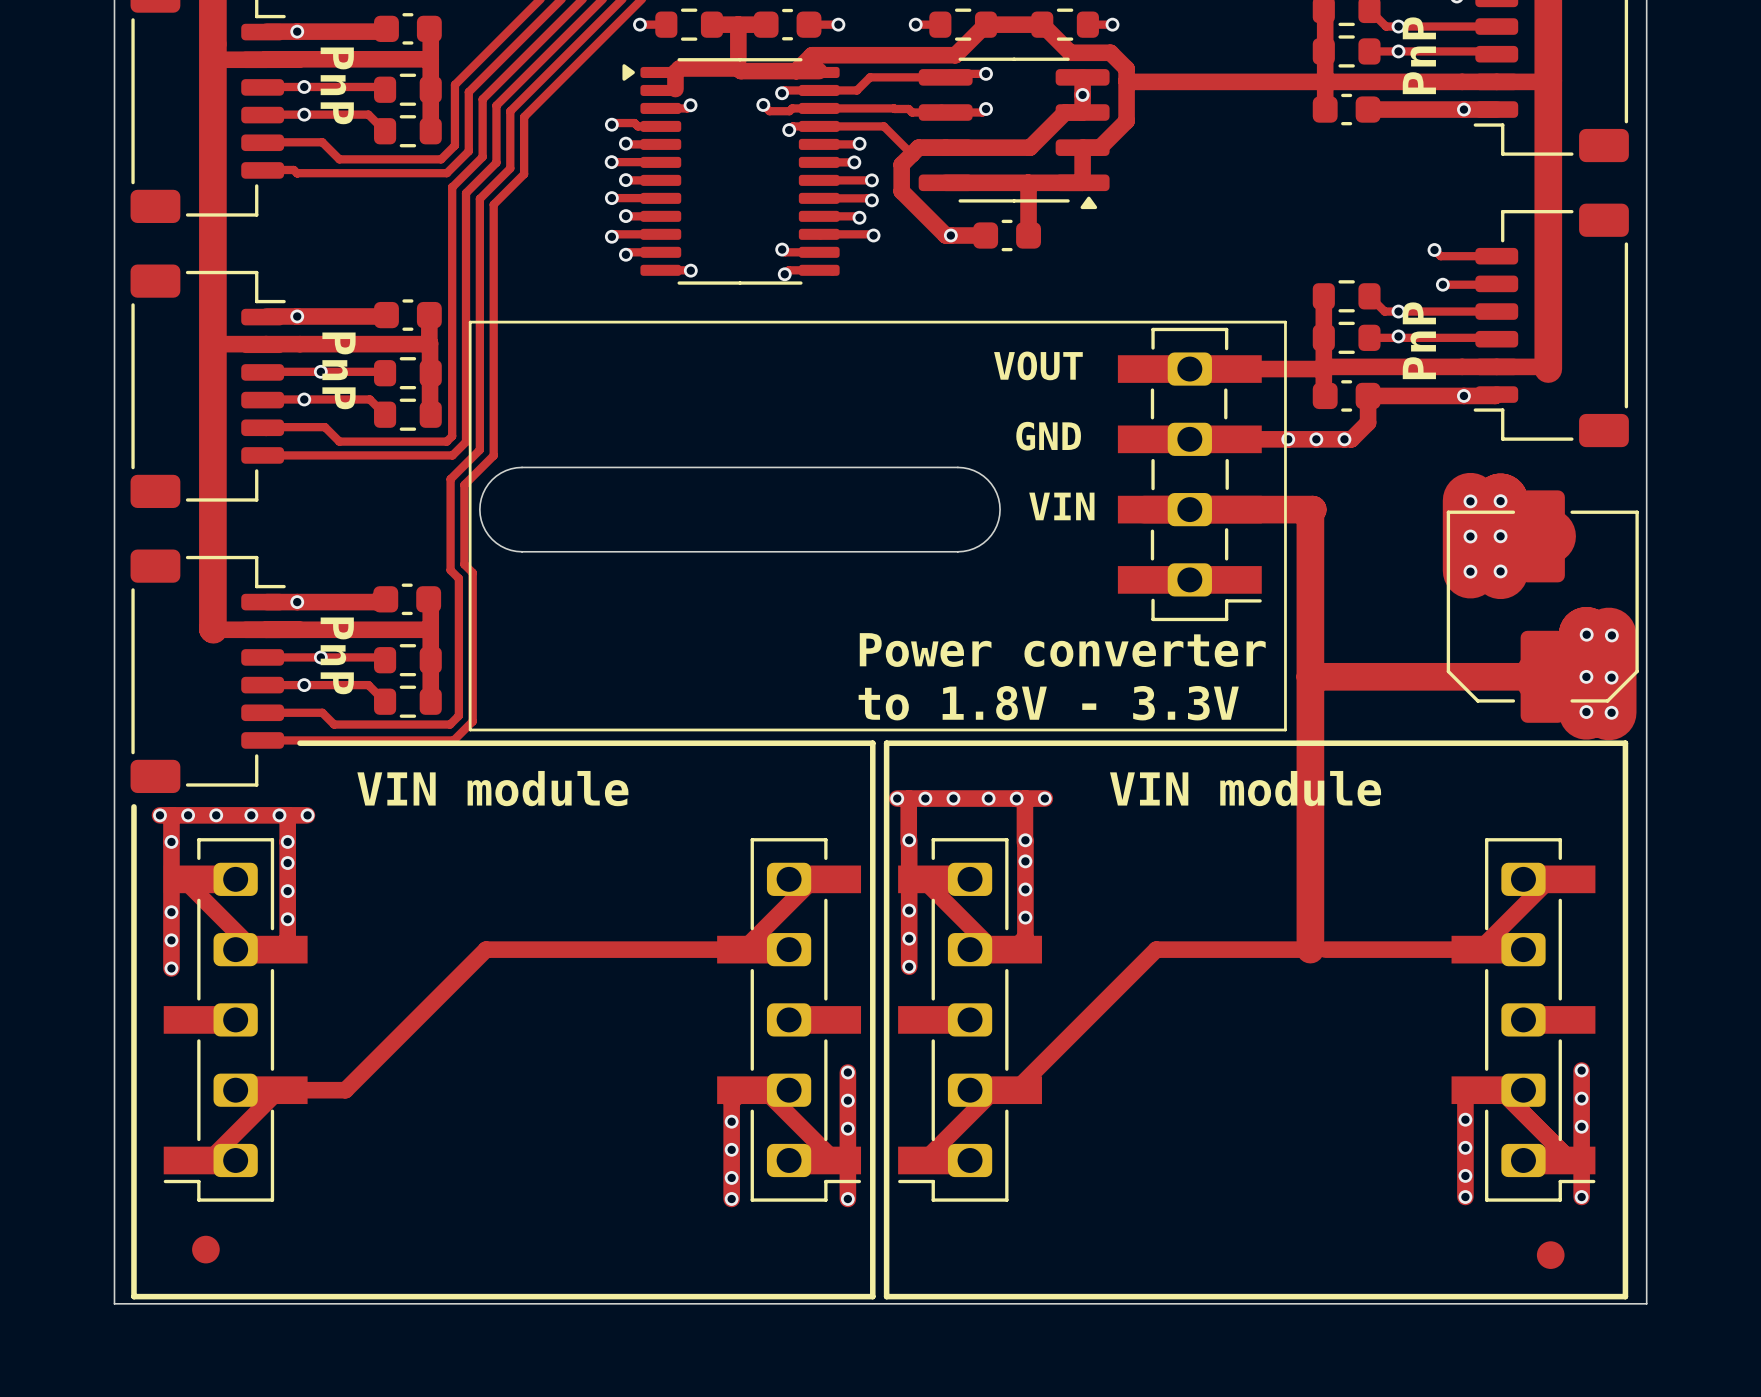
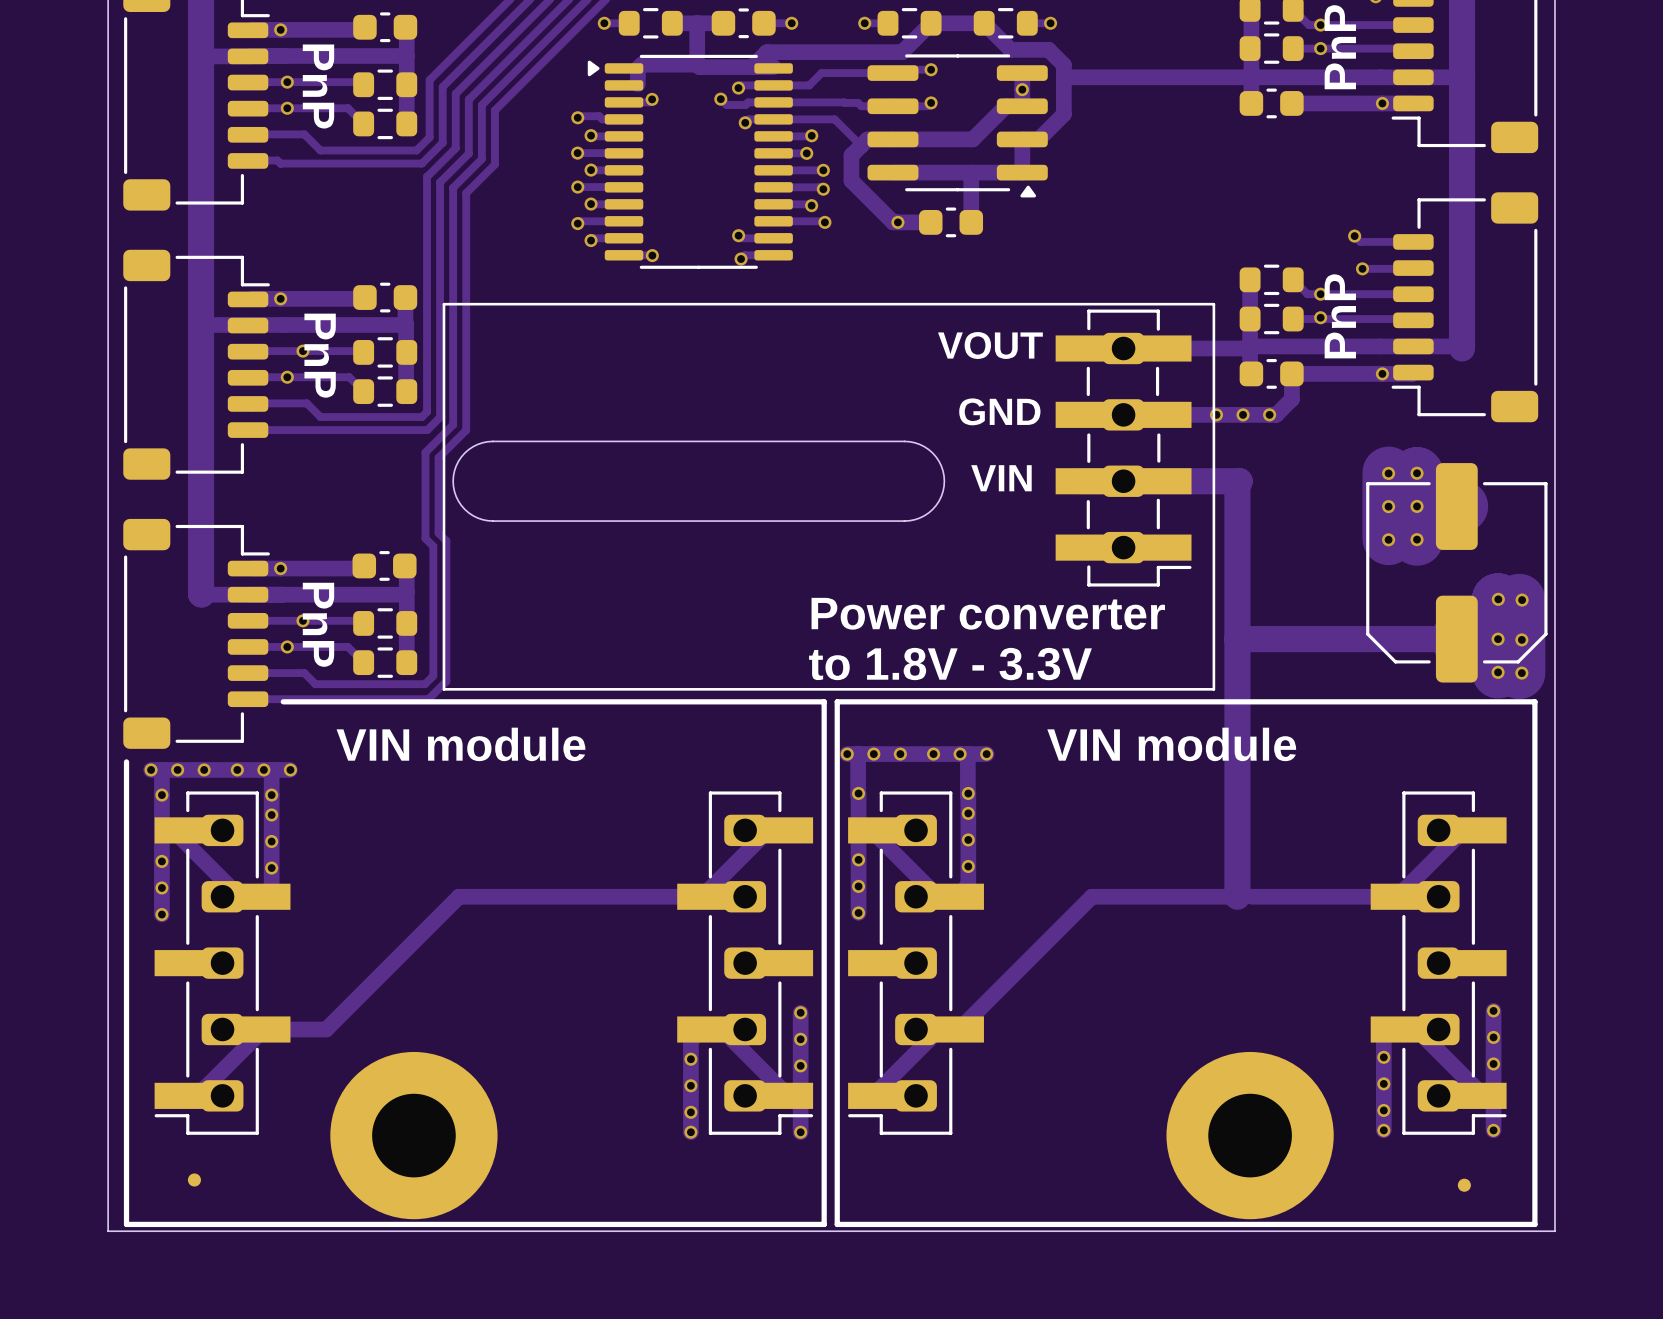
part: none -> (413, 1135)
part: none -> (1250, 1135)
part footprint: [192, 1235, 220, 1264] -> [187, 1173, 201, 1187]
part footprint: [1536, 1241, 1565, 1269] -> [1457, 1178, 1471, 1192]

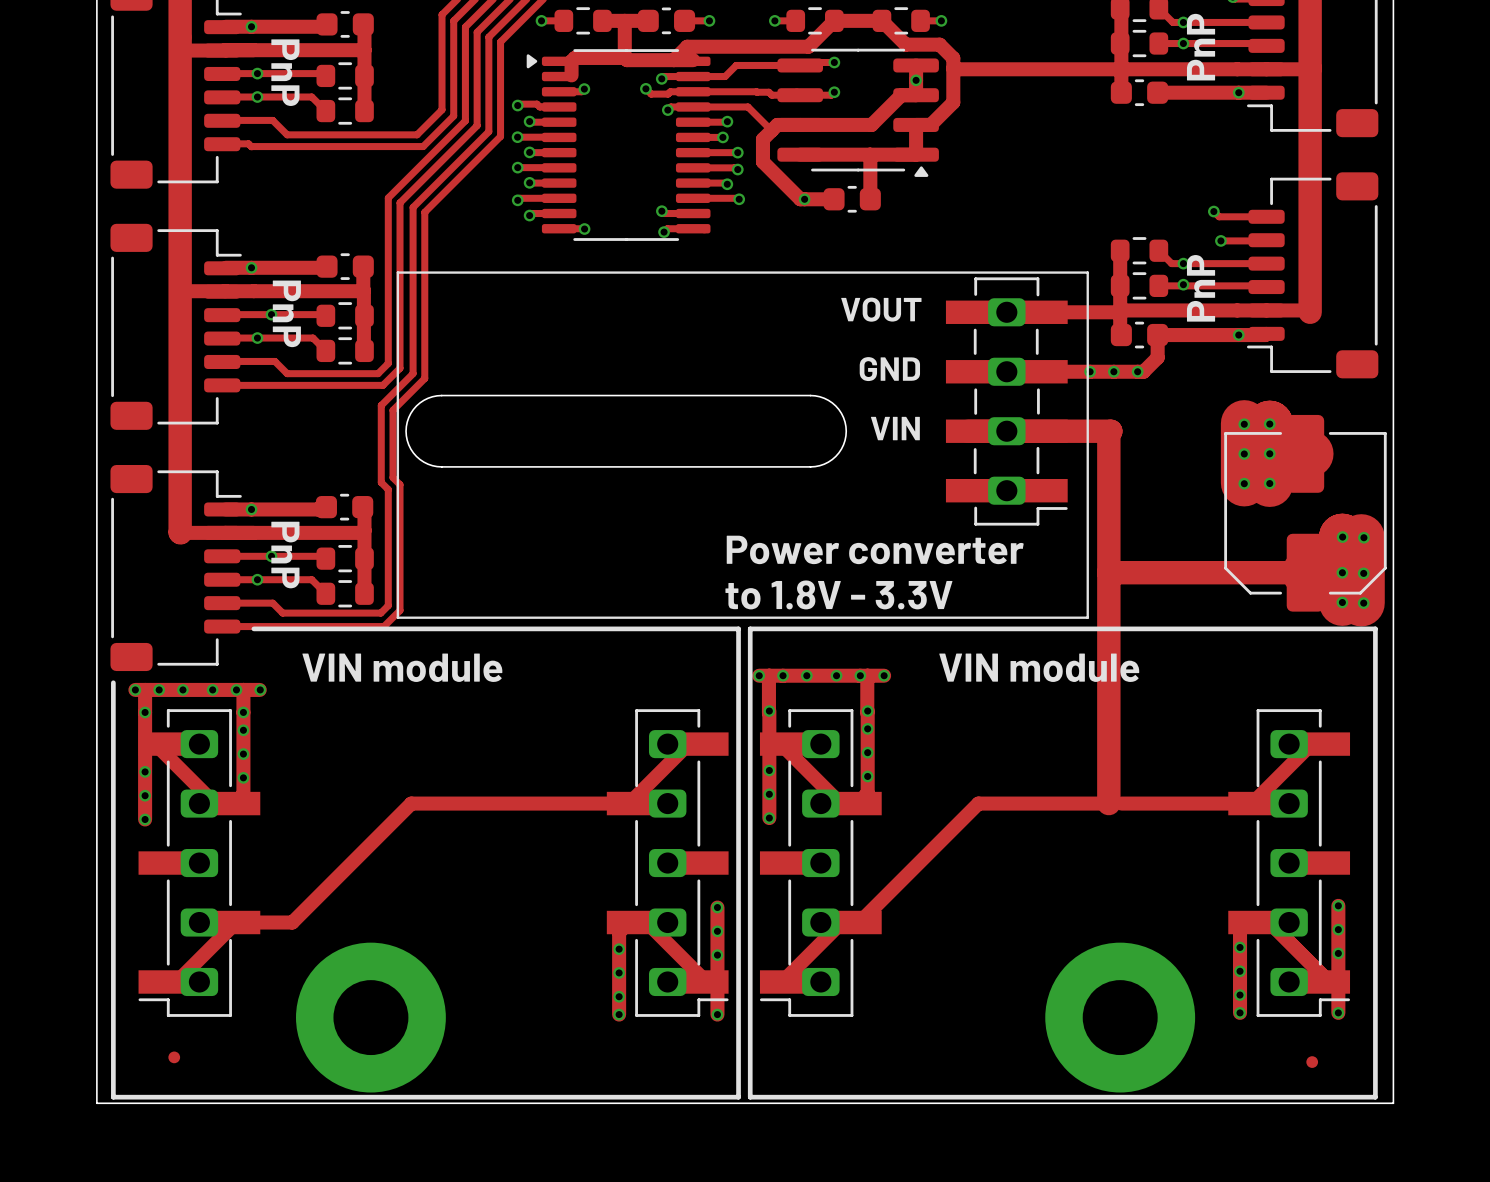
track: (493, 16) (429, 80) (429, 137) (416, 150) -> (442, 14) (442, 109) (417, 134) (373, 134)
track: (506, 23) (442, 86) (442, 142) (421, 163) -> (453, 20) (453, 116) (423, 146) (378, 146)
track: (519, 30) (455, 93) (455, 148) (427, 176) -> none
track: (532, 36) (468, 99) (468, 153) (440, 182) (440, 417) -> (477, 32) (477, 125) (400, 202) (400, 368) (394, 373)
track: (545, 41) (481, 105) (481, 159) (453, 187) (453, 424) -> (488, 37) (488, 131) (413, 207) (413, 373) (406, 380)
track: (558, 46) (494, 110) (494, 164) (466, 193) (466, 430) -> (500, 41) (500, 136) (424, 212) (424, 378) (417, 385)
track: (427, 176) (427, 411) -> (465, 27) (465, 120) (388, 198) (388, 363) (382, 369)

